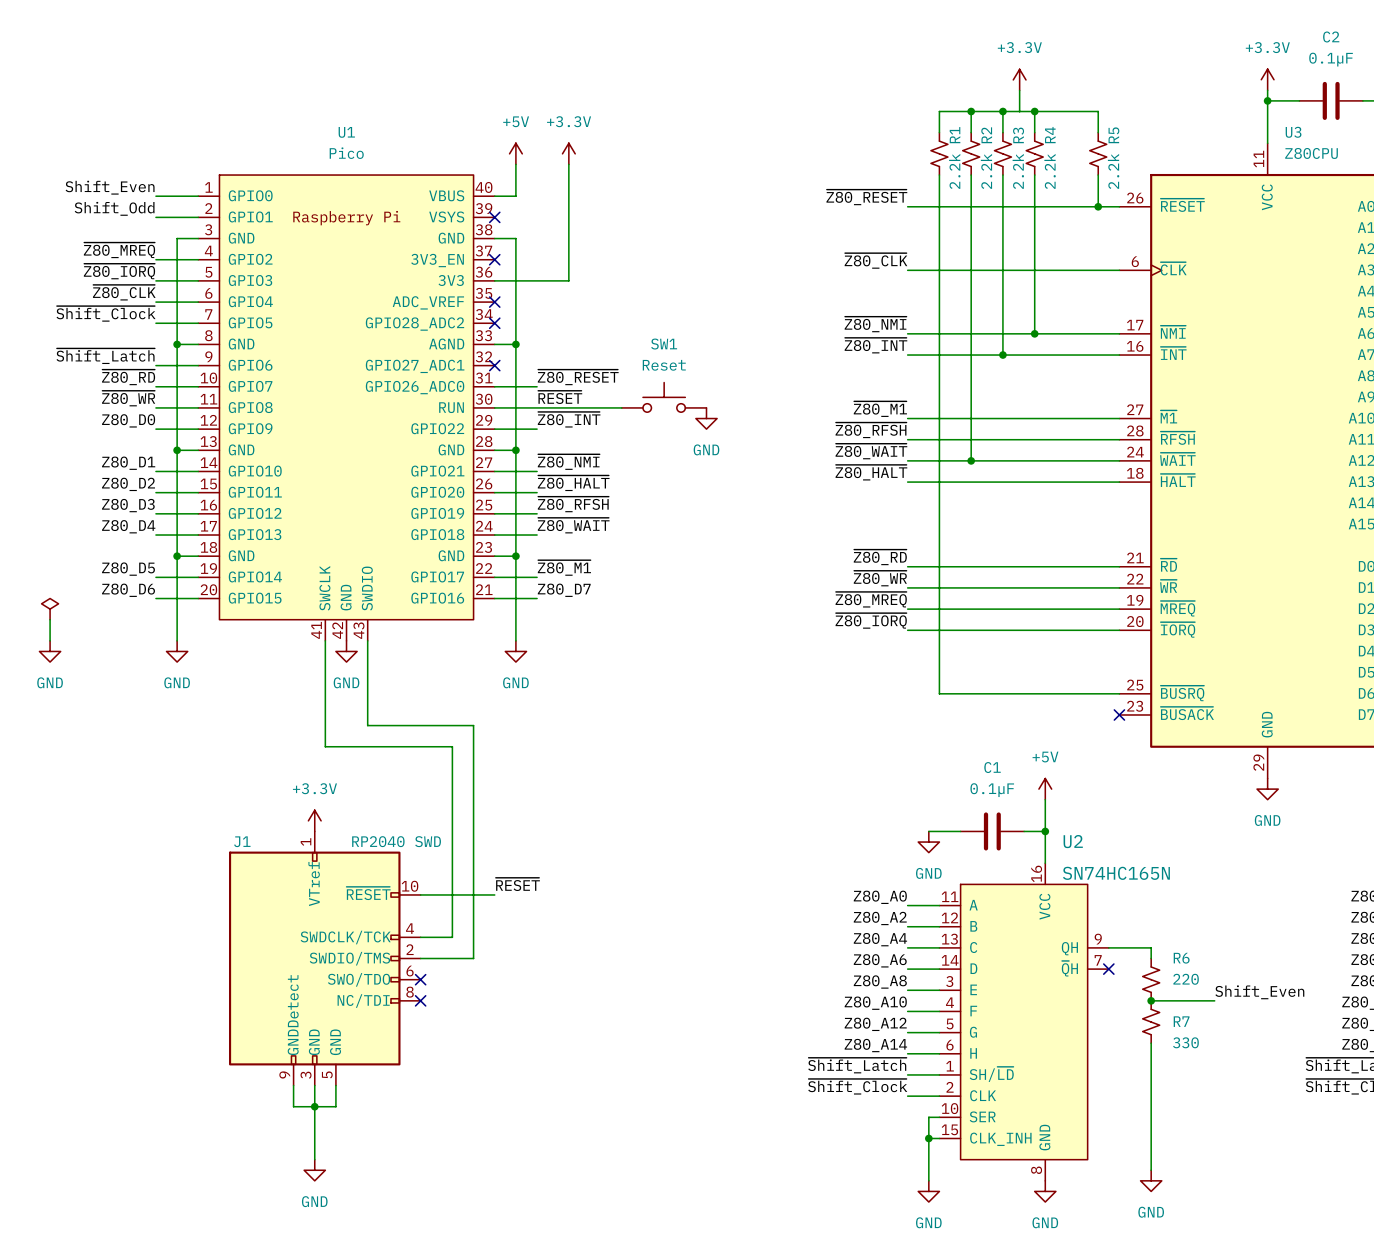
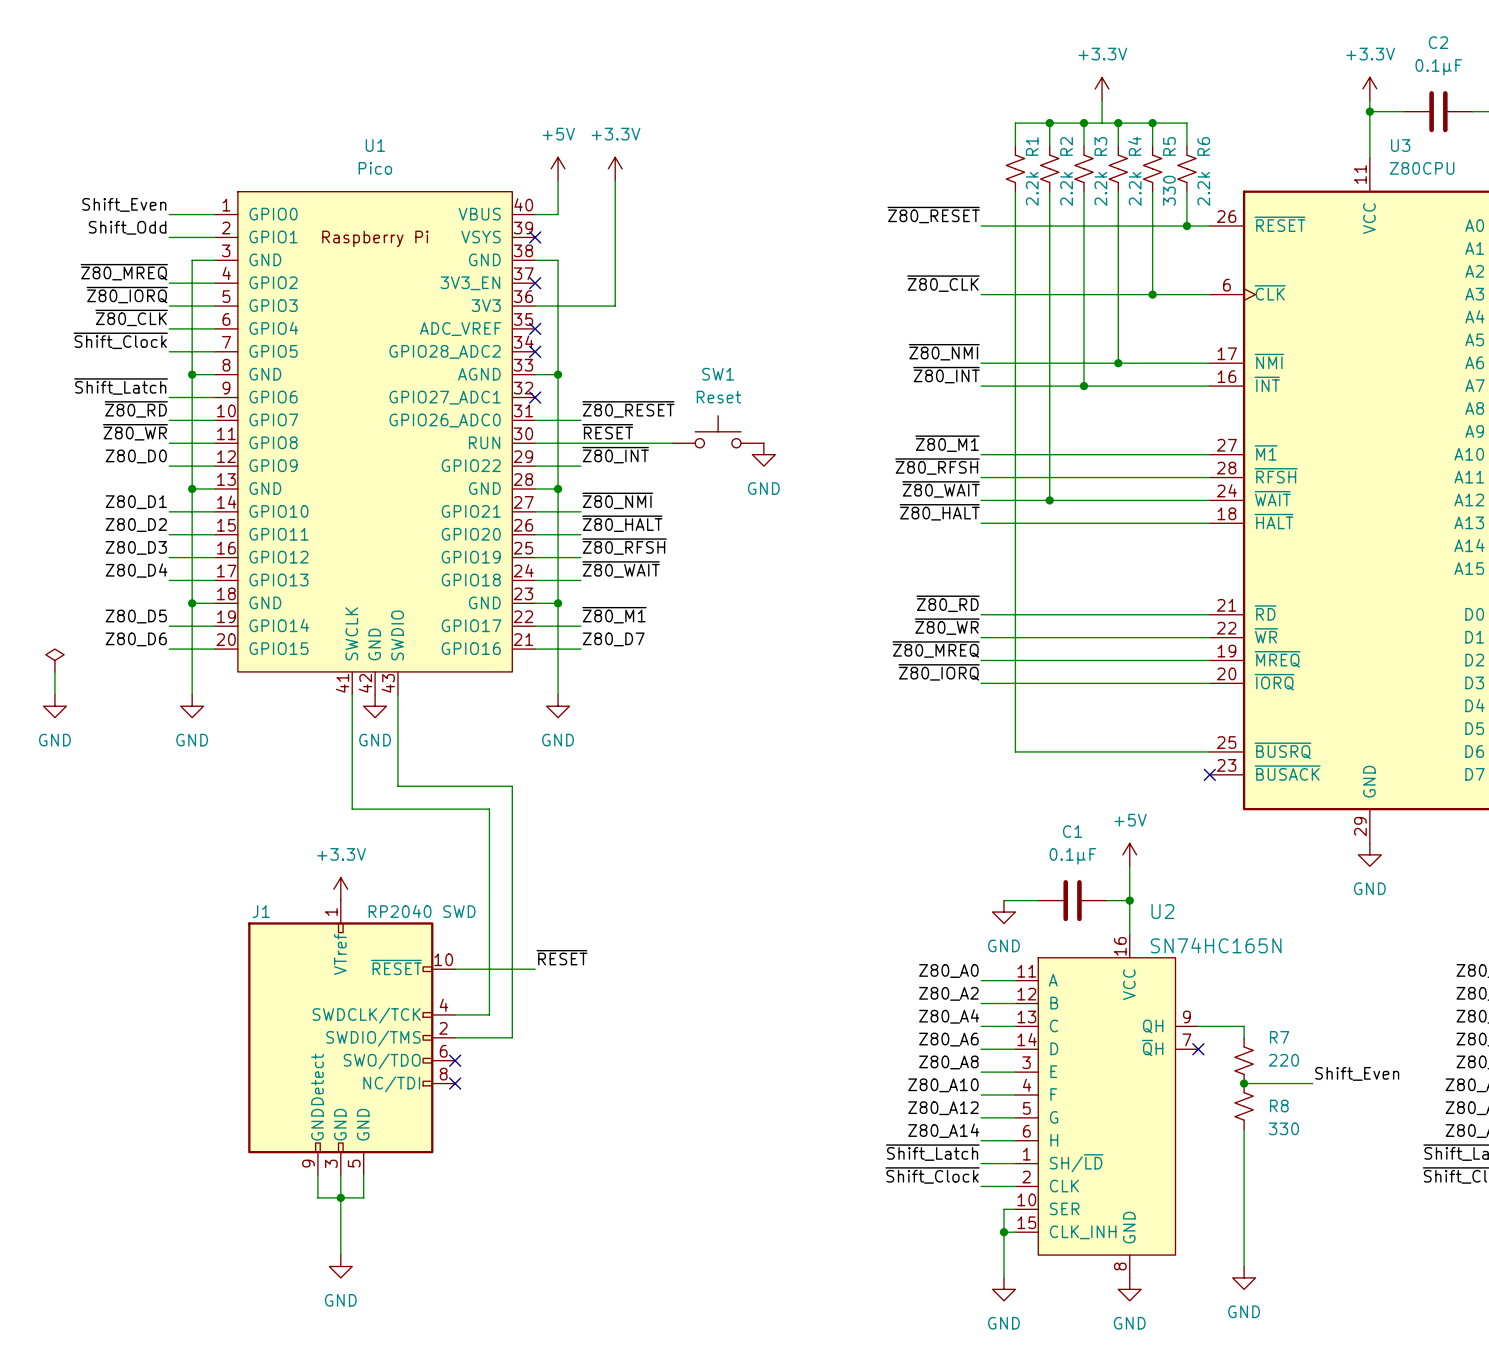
wire: none -> (1152, 123) (1152, 145)
junction: none -> (1152, 123)
R5 name: R5 (1113, 135) -> R6 (1203, 146)
R5: none -> 330 (1152, 168)
wire: none -> (1152, 191) (1152, 294)
junction: none -> (1152, 294)
R6 name: R6 (1181, 958) -> R7 (1279, 1037)
R7 name: R7 (1181, 1021) -> R8 (1279, 1105)

